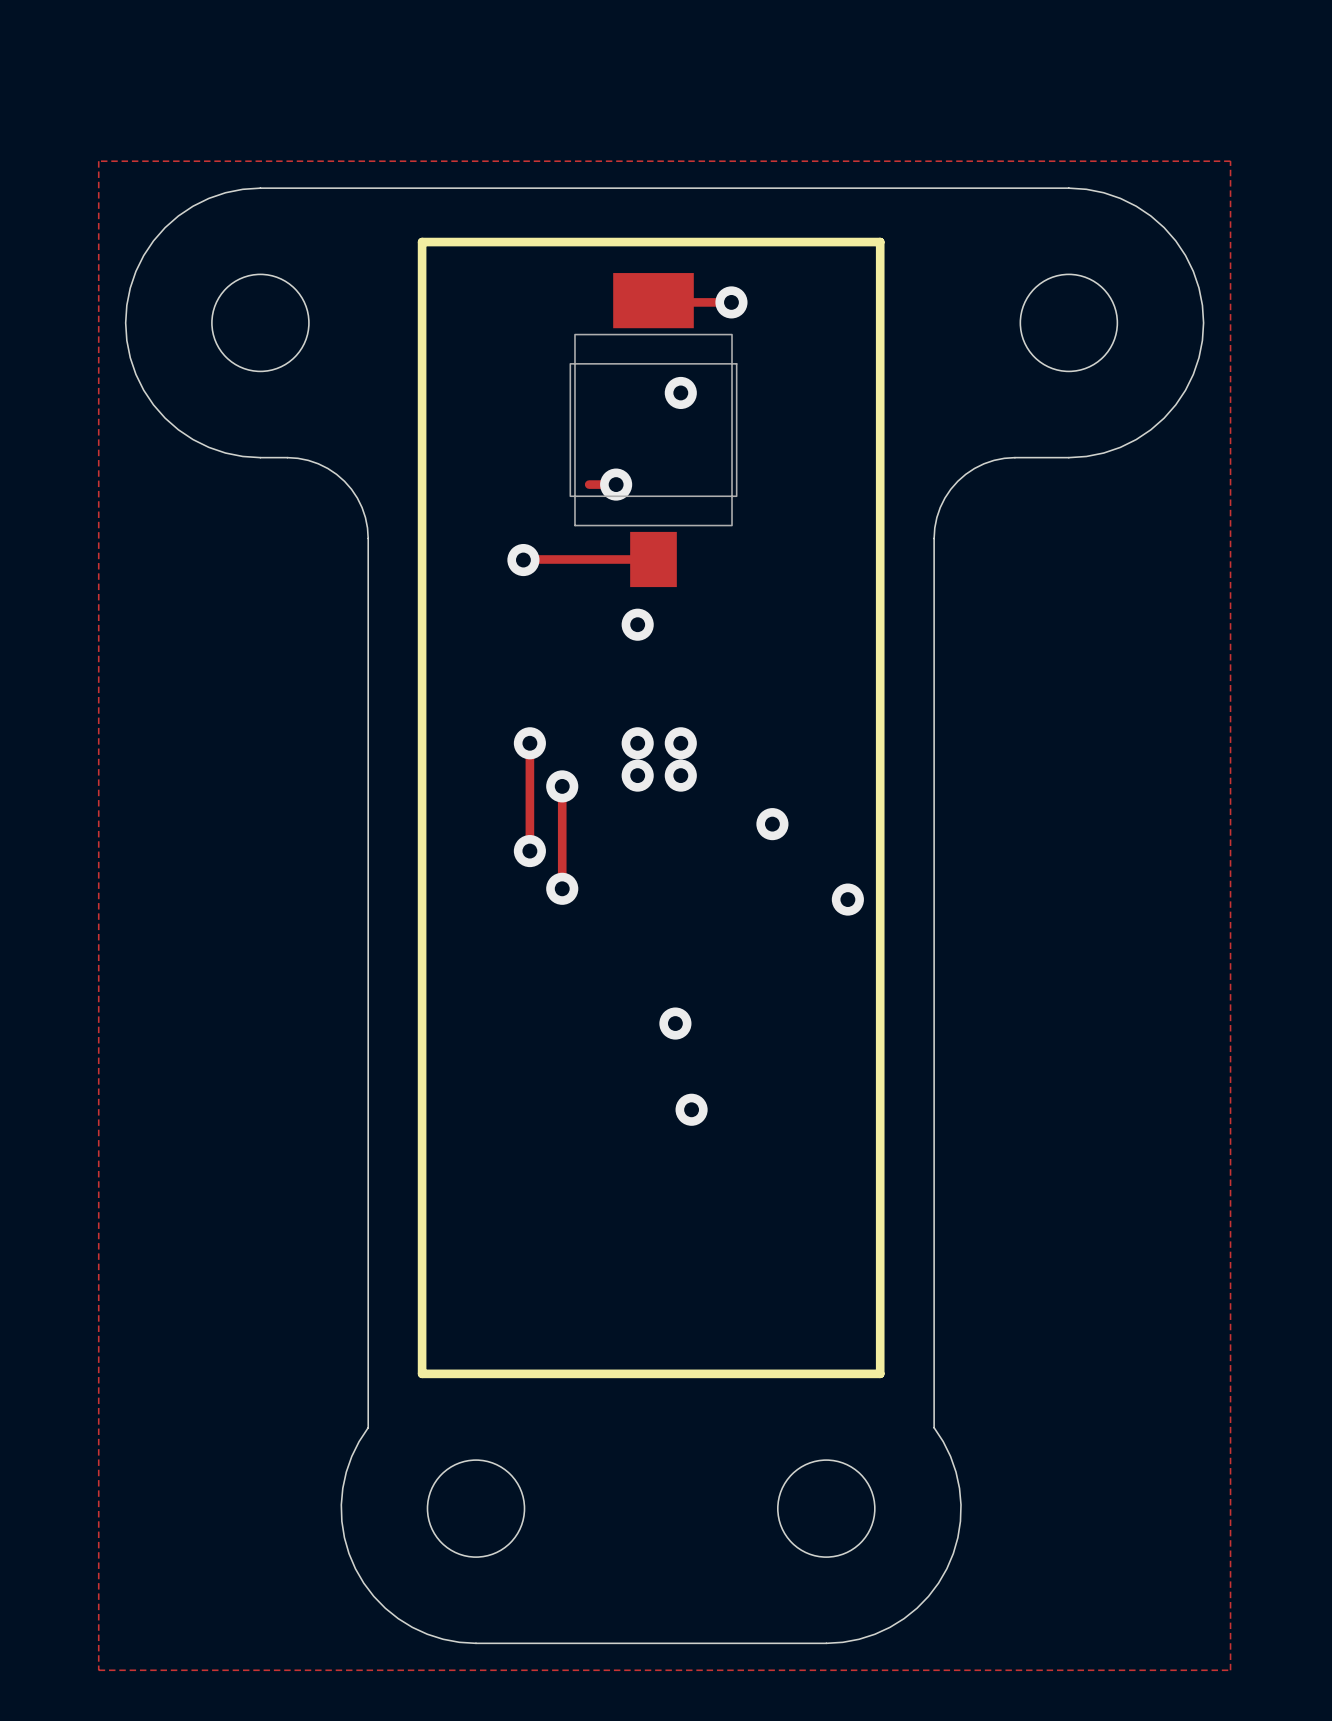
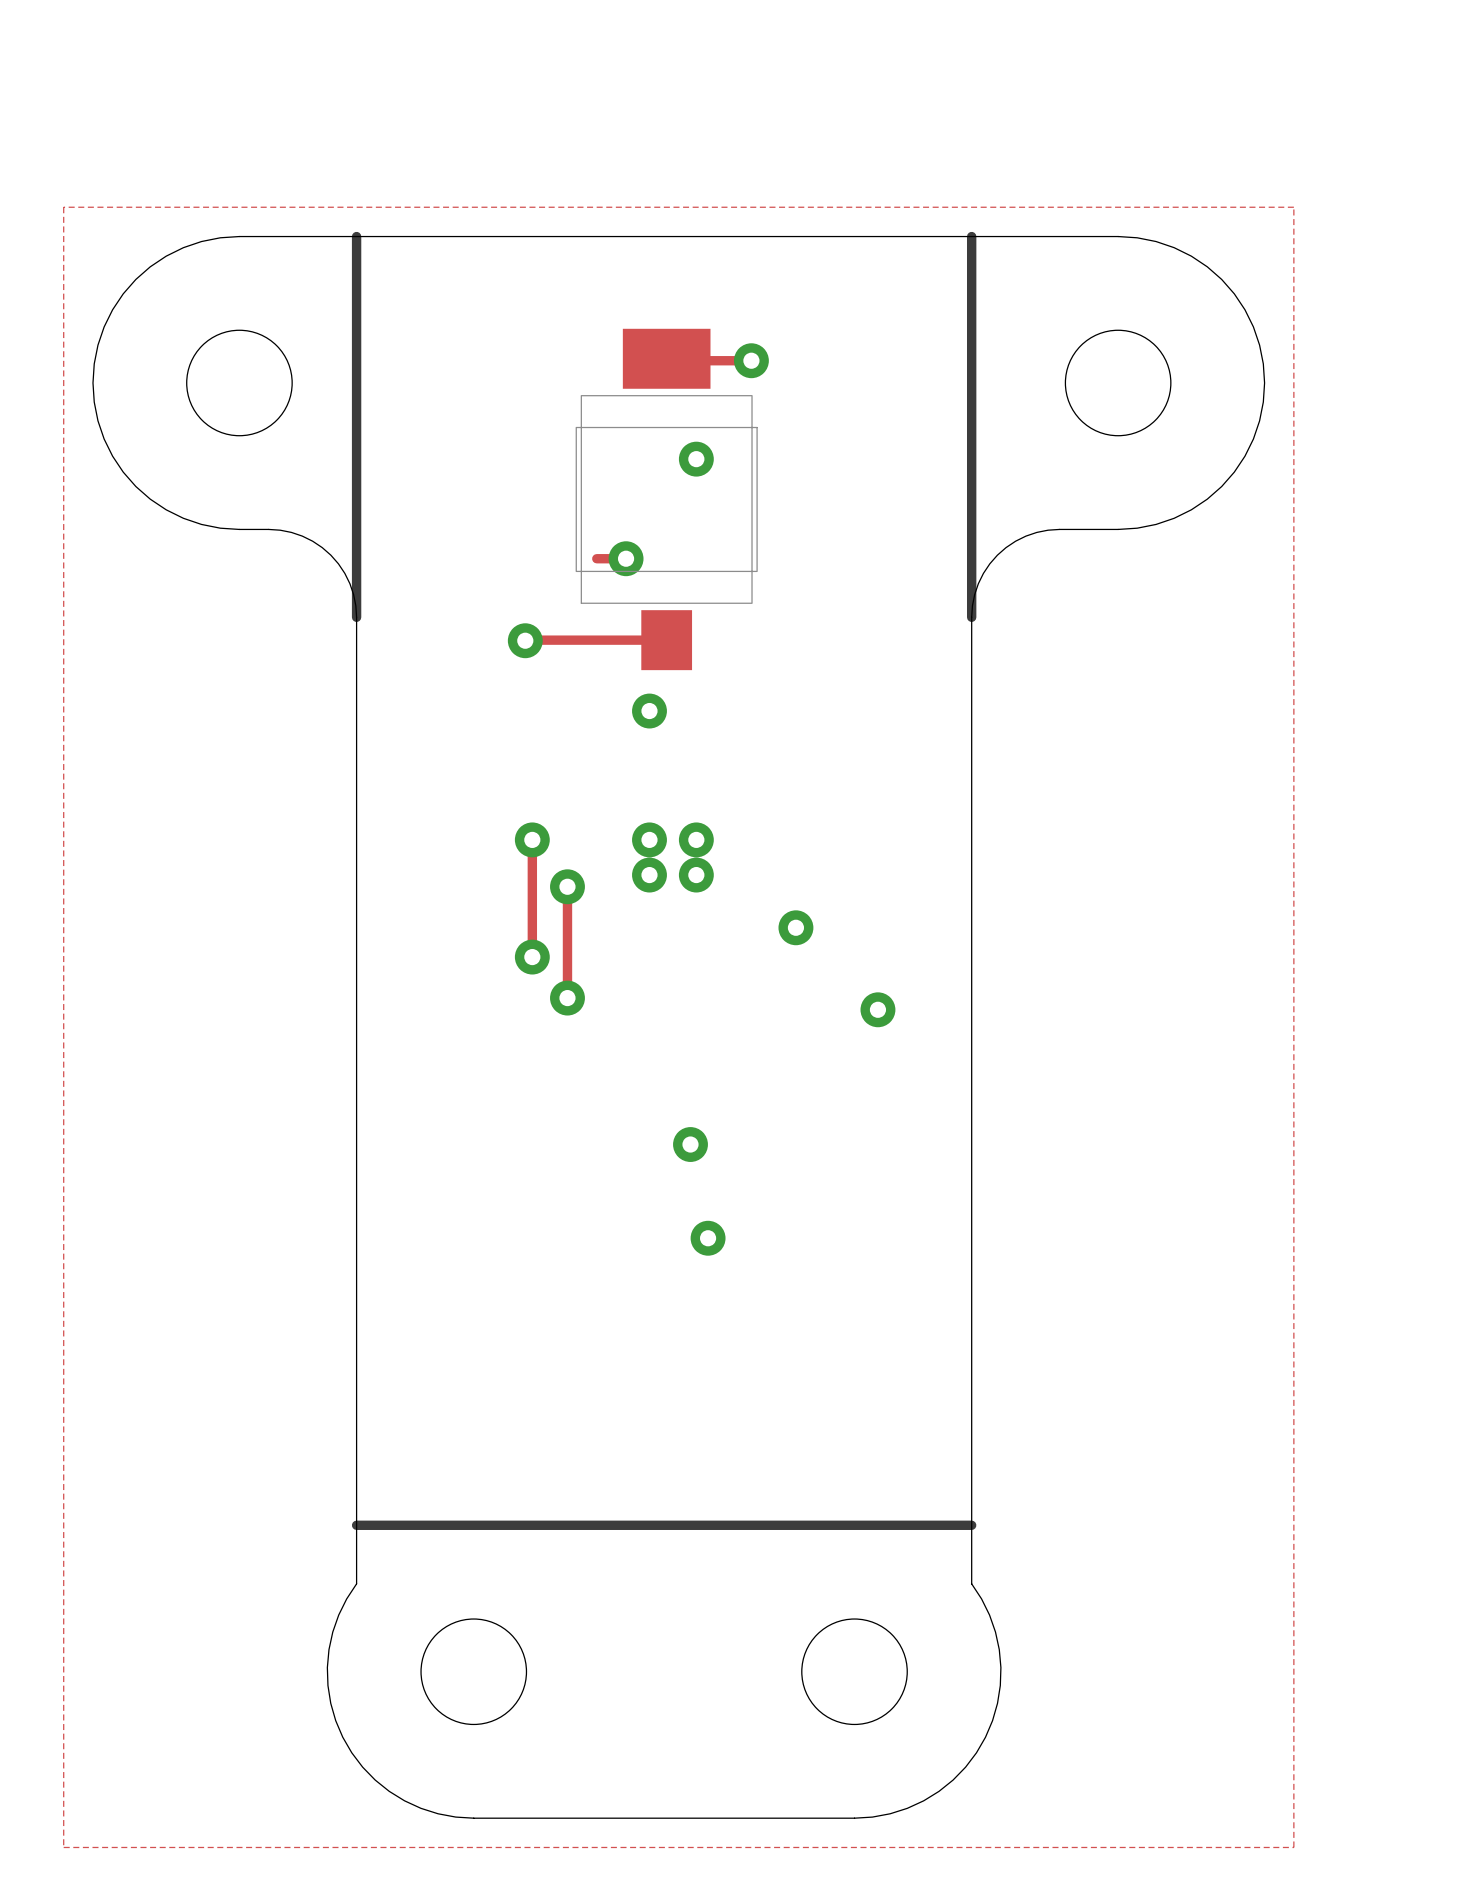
line: none -> (356, 236) (356, 617)
line: none -> (971, 236) (971, 617)
line: (422, 1373) (422, 242) (880, 242) (880, 1373) -> (415, 1525) (356, 1525)
line: none -> (913, 1525) (971, 1525)

